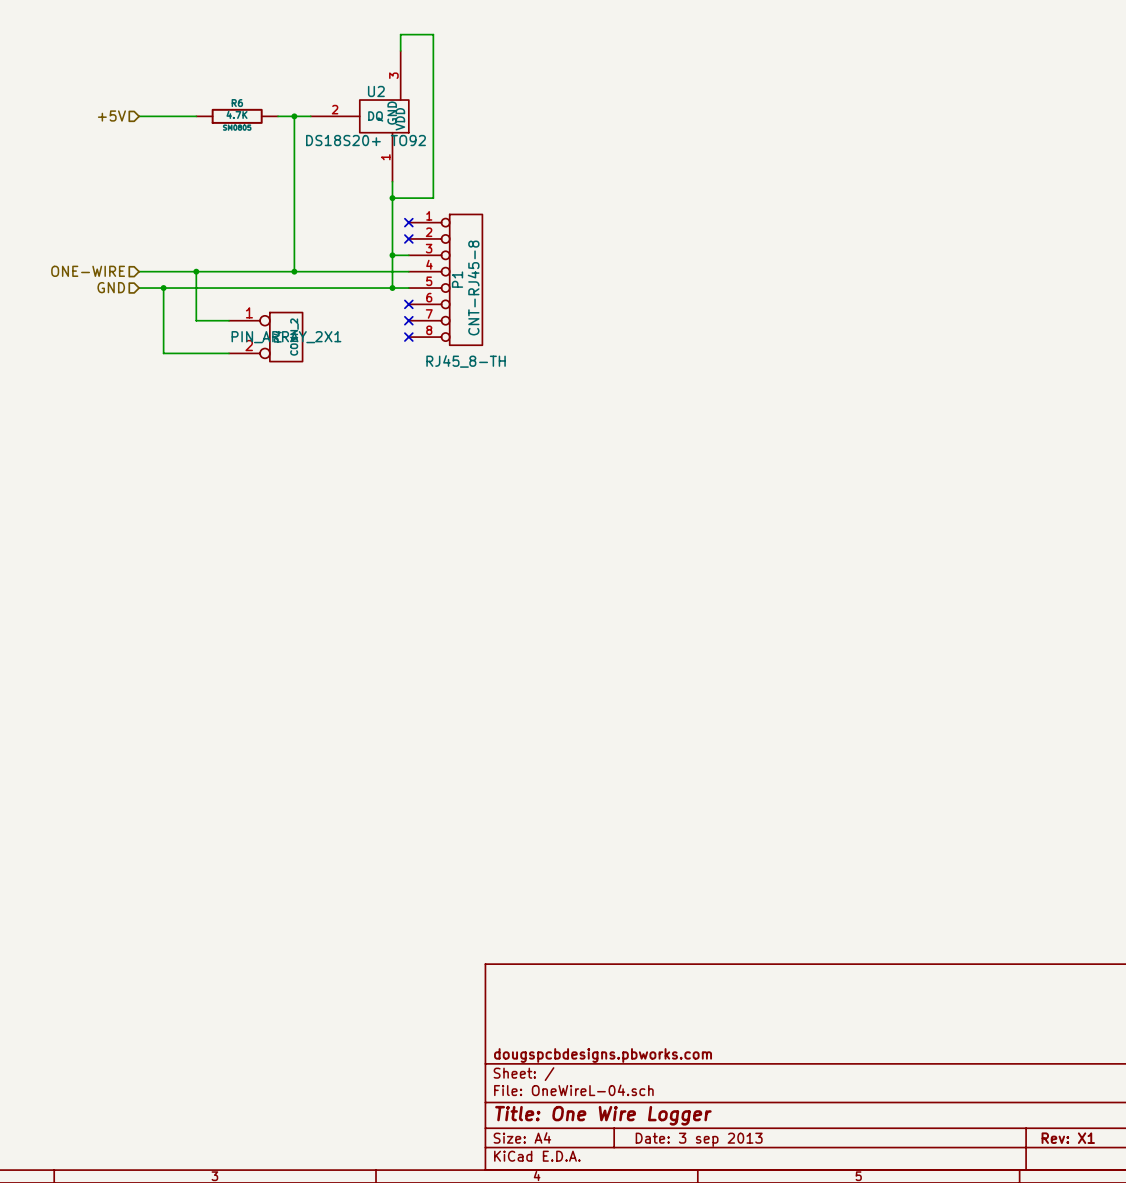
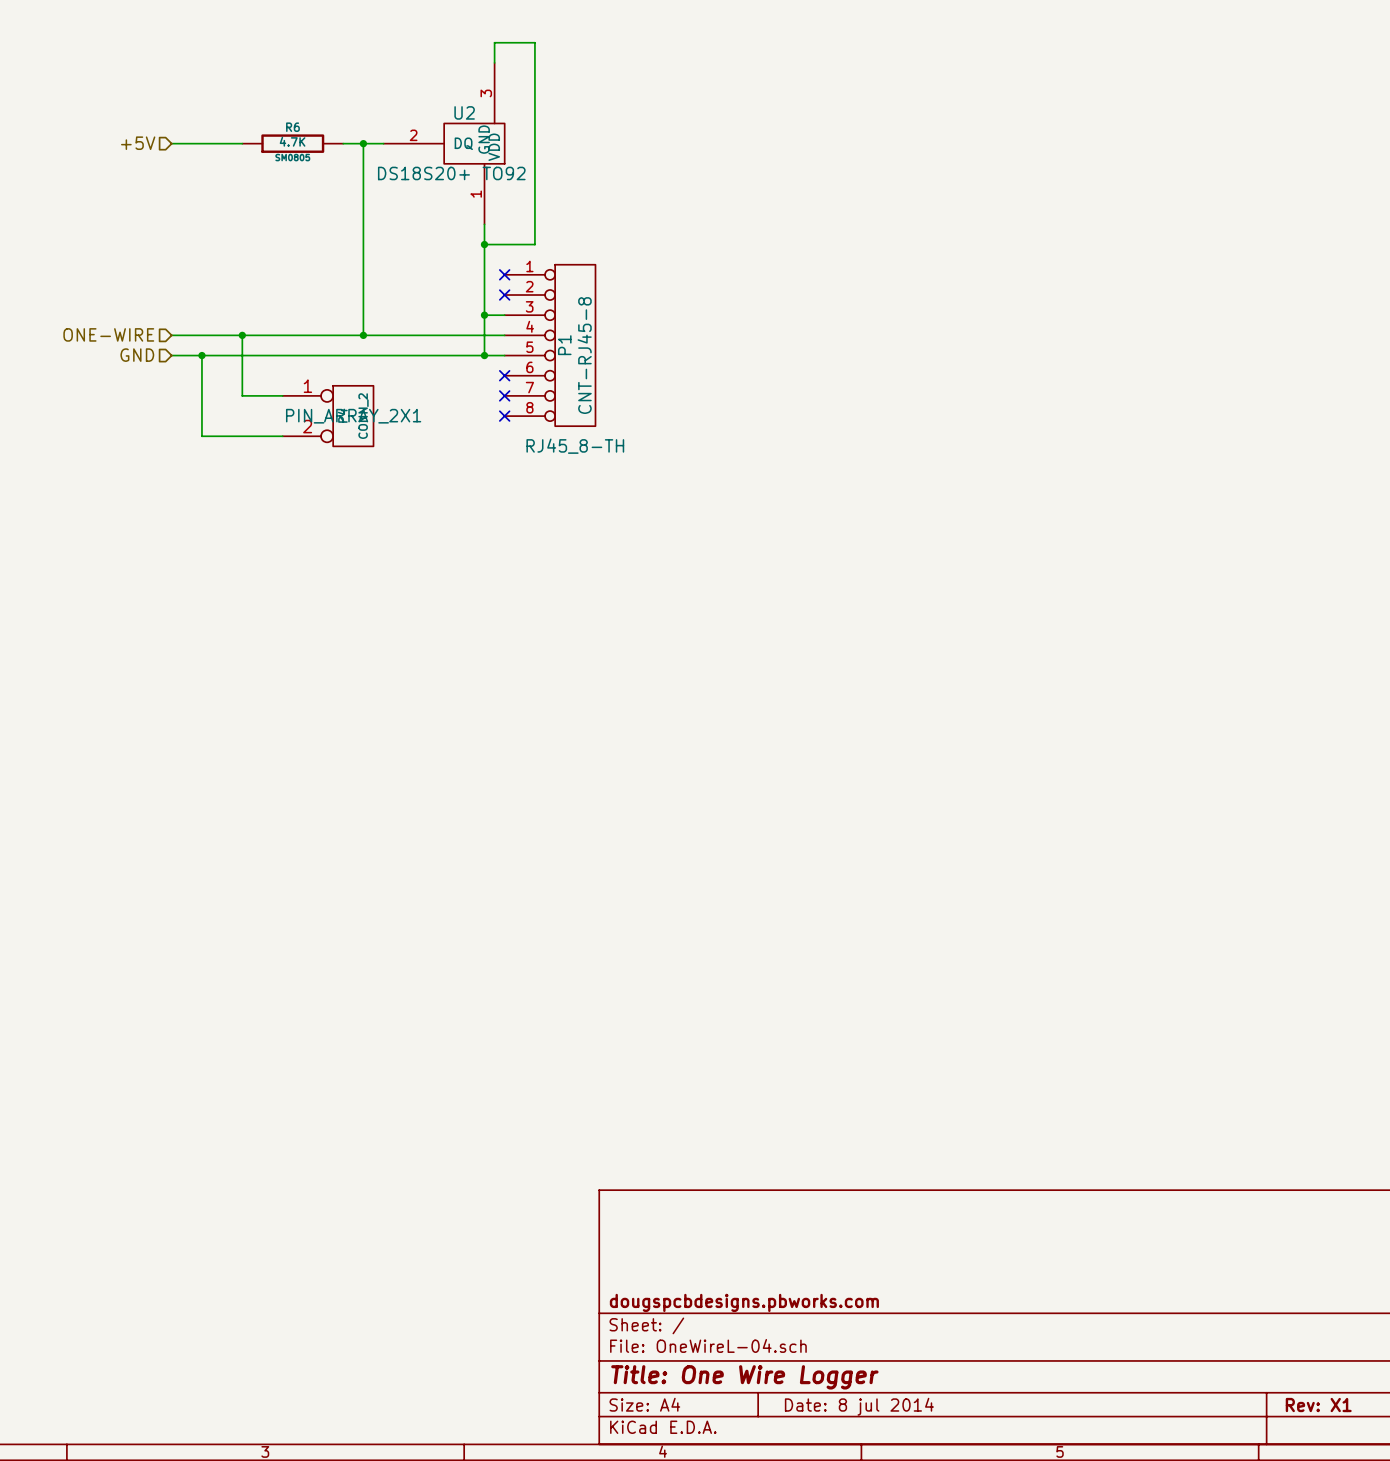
title block: Date: 3 sep 2013 (699, 1139) -> Date: 8 jul 2014 (859, 1406)

